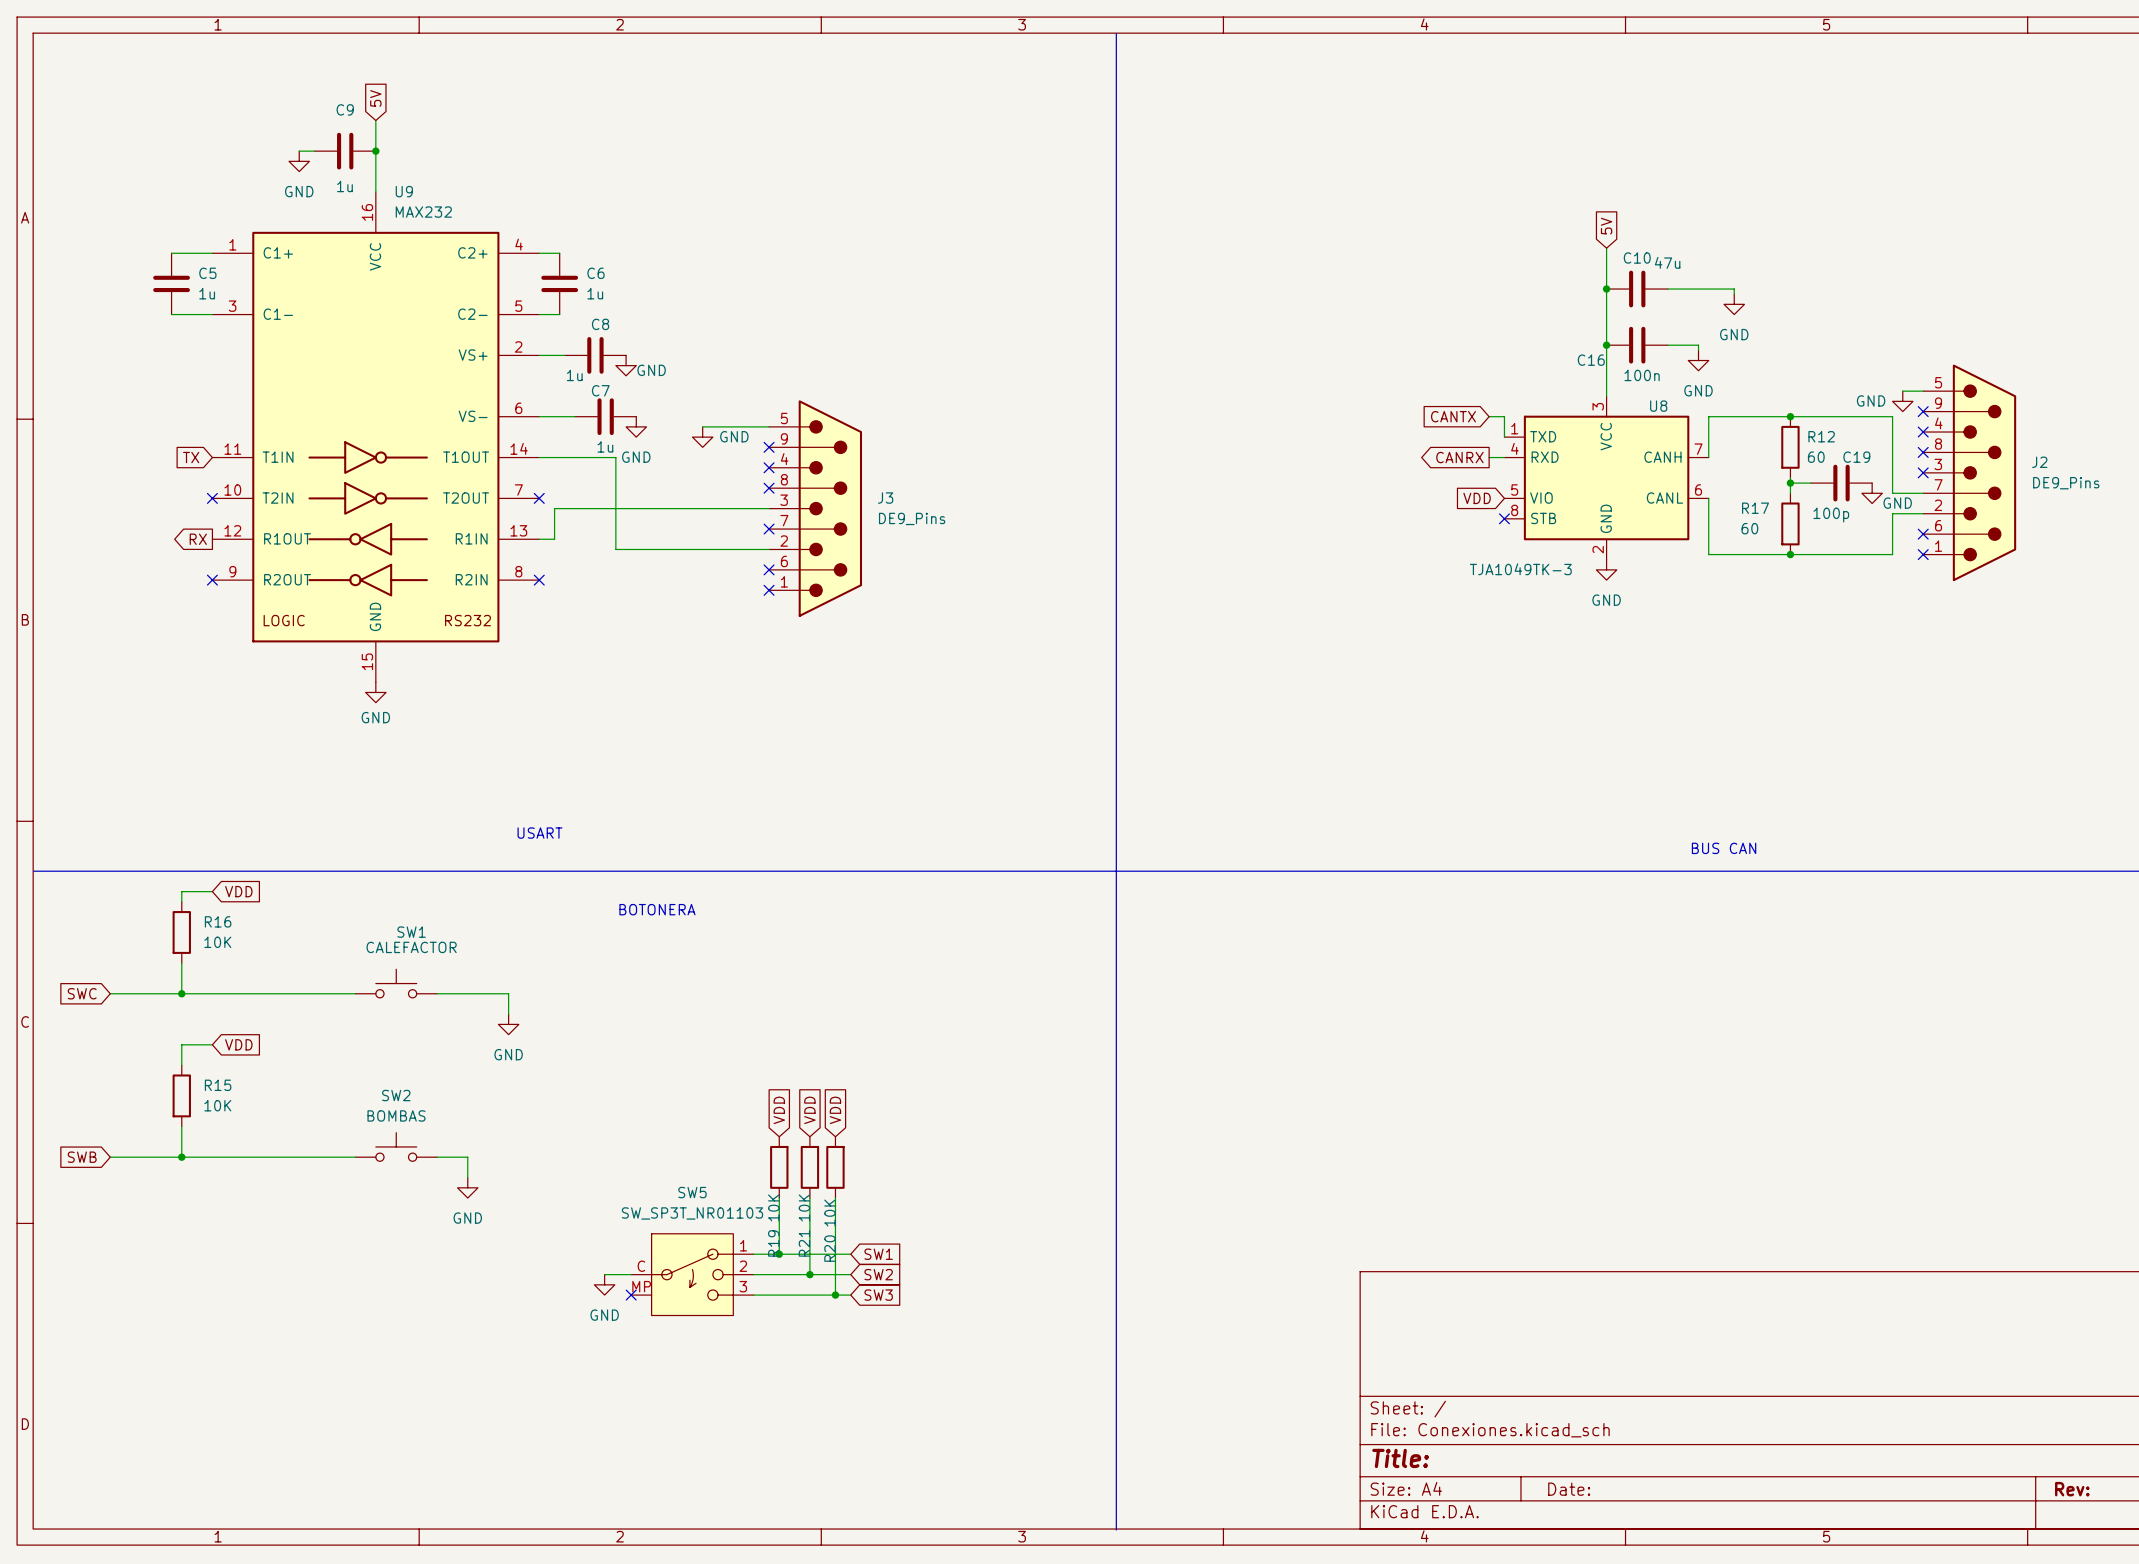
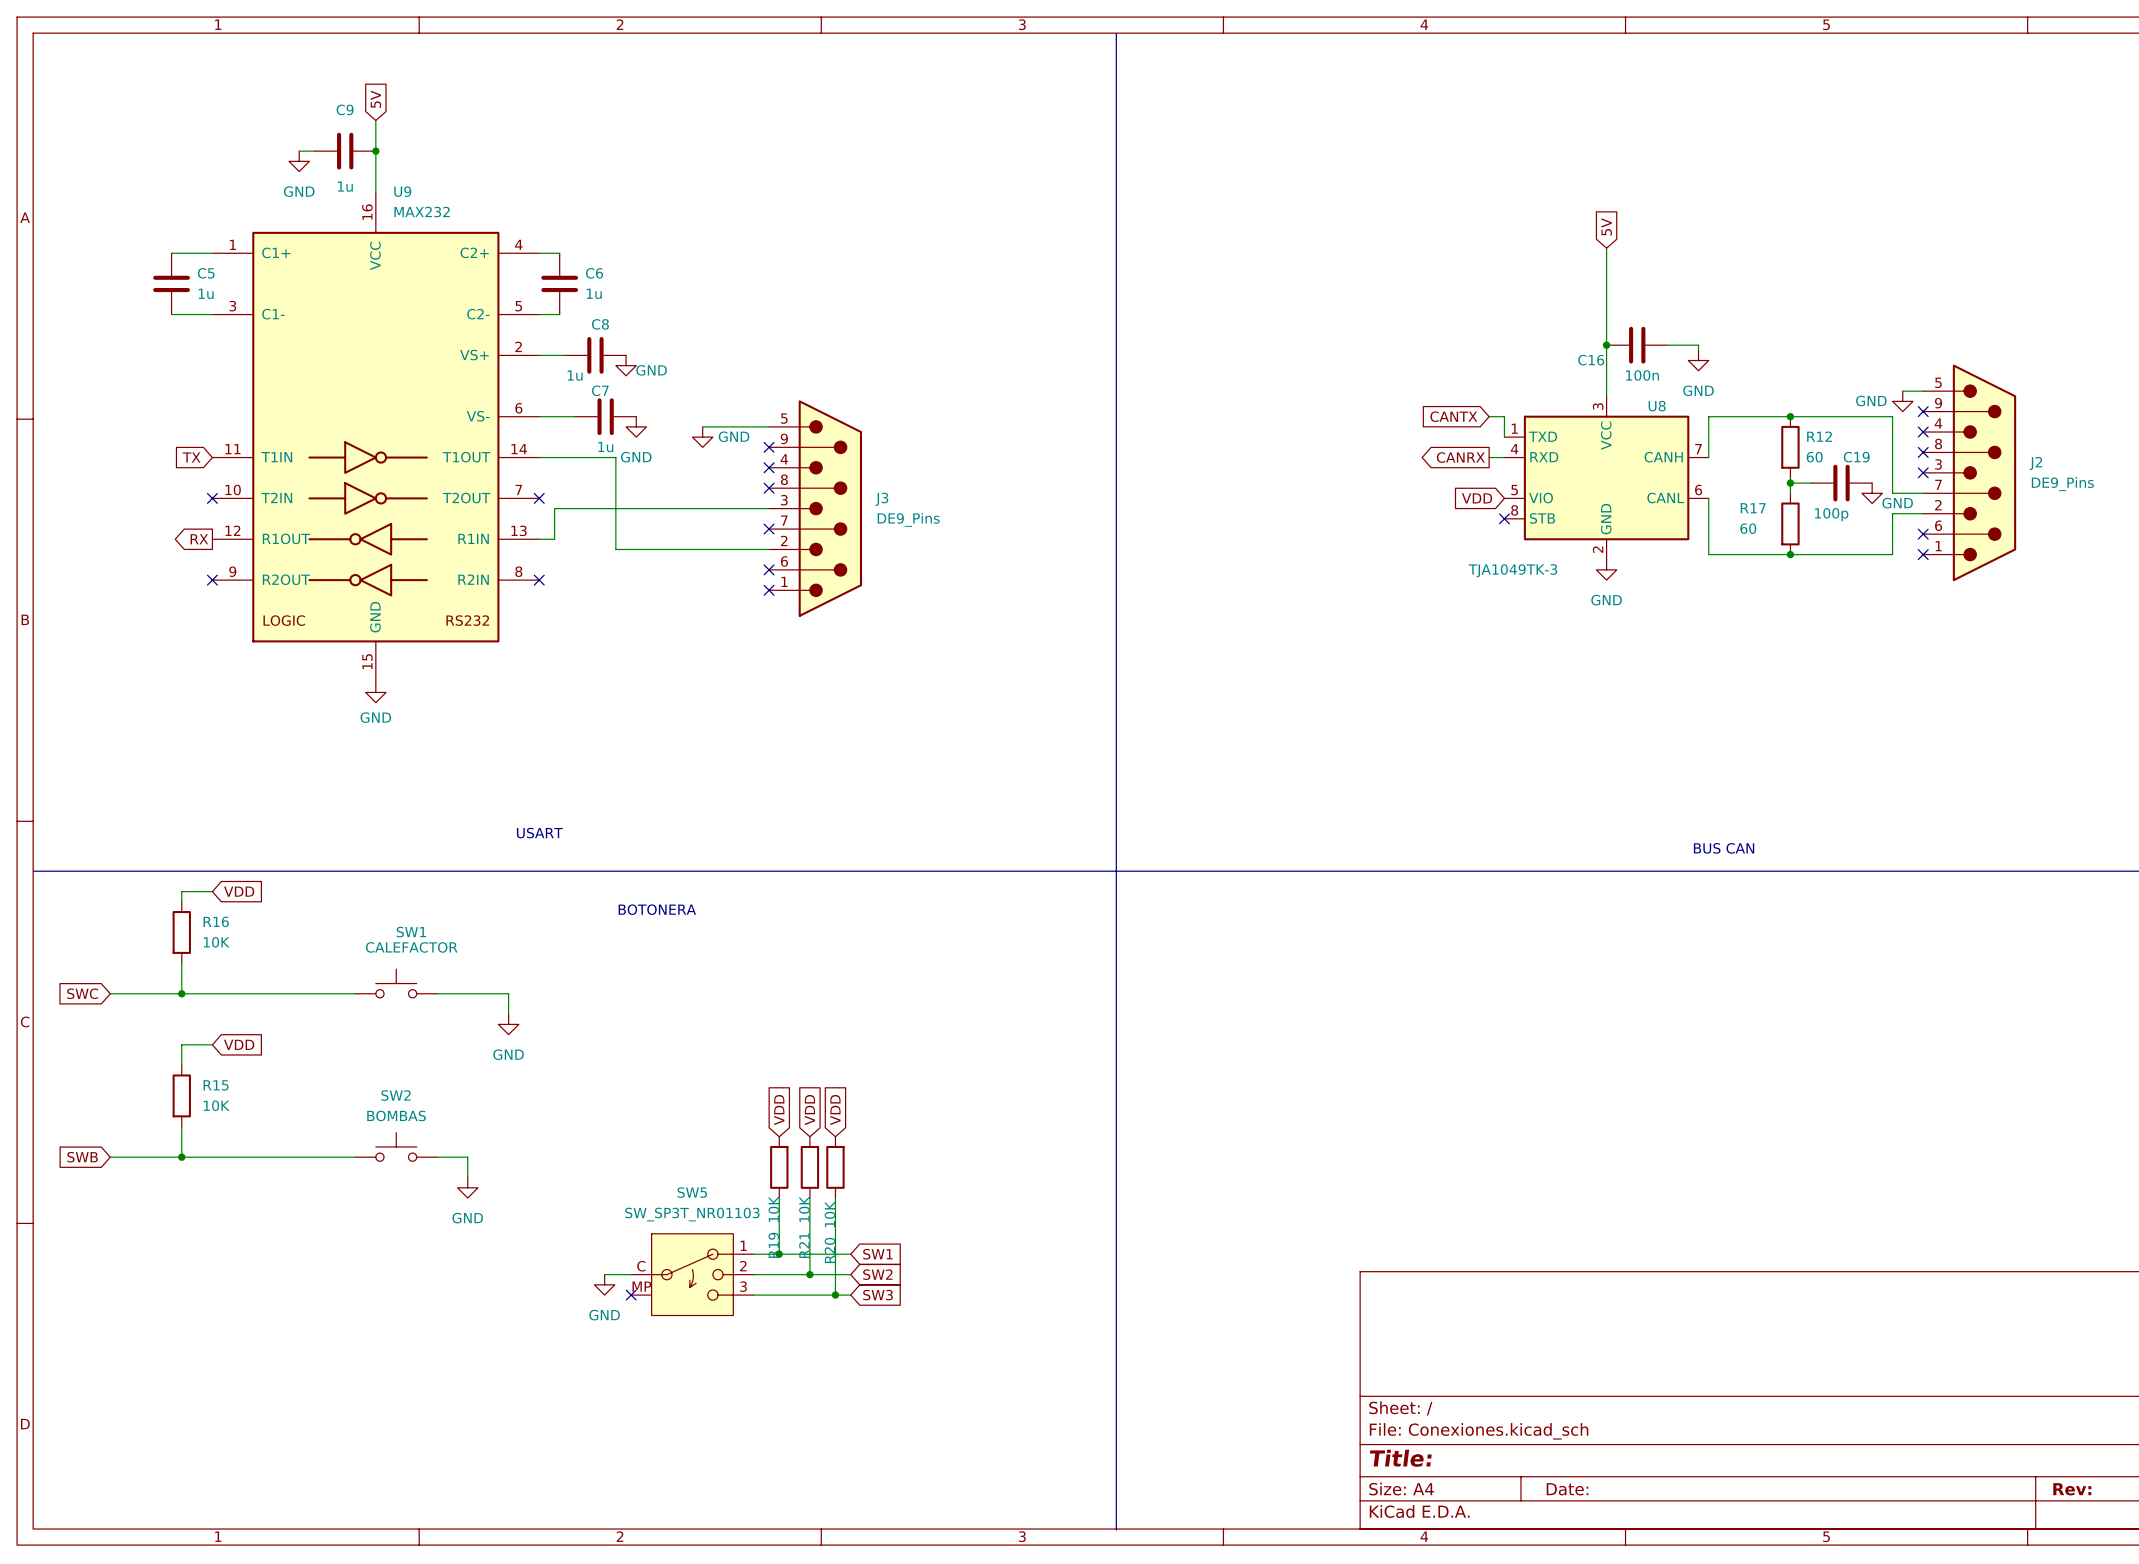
junction: (1606, 289) -> none
C10: 47u (1637, 289) -> none
wire: (1667, 289) (1734, 289) (1734, 294) -> none
power symbol: GND (1734, 304) -> none

